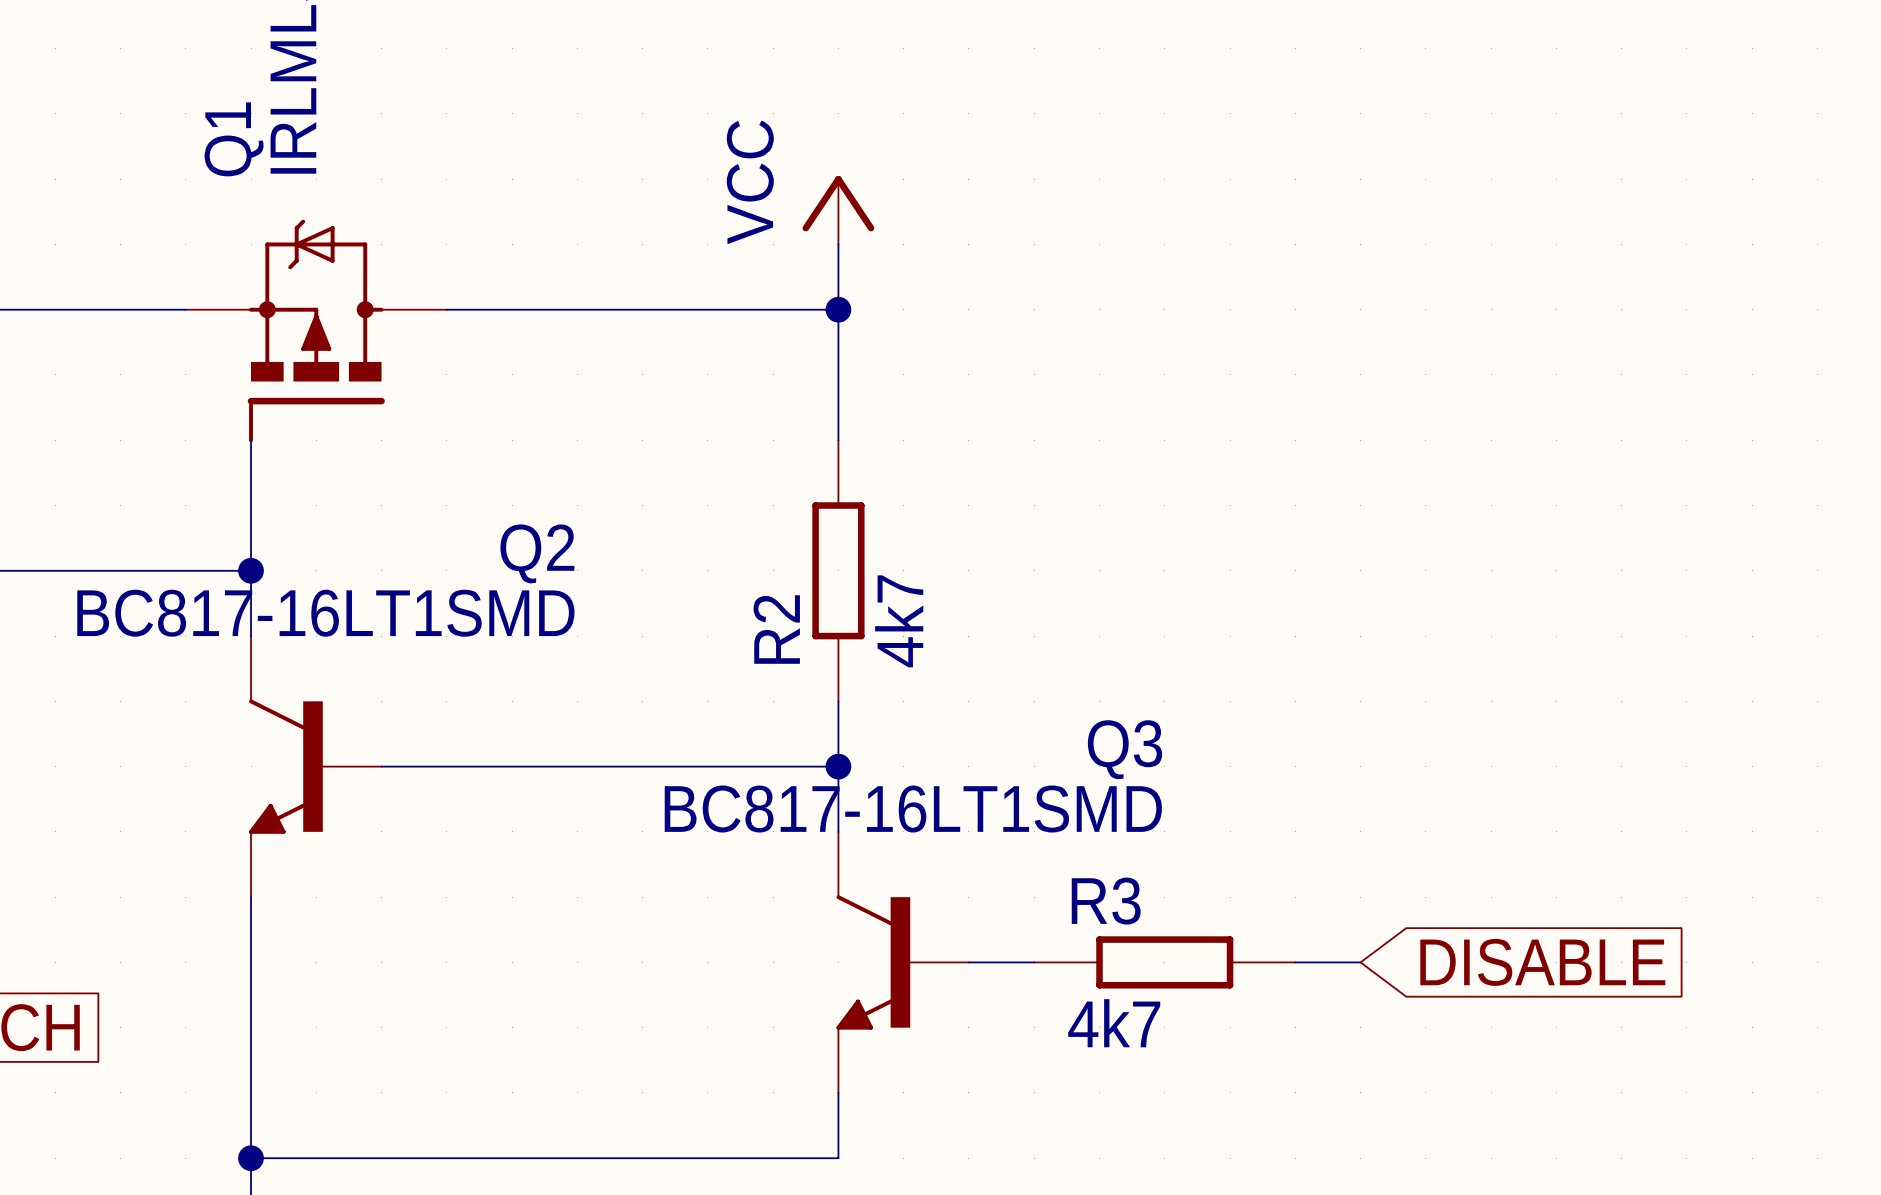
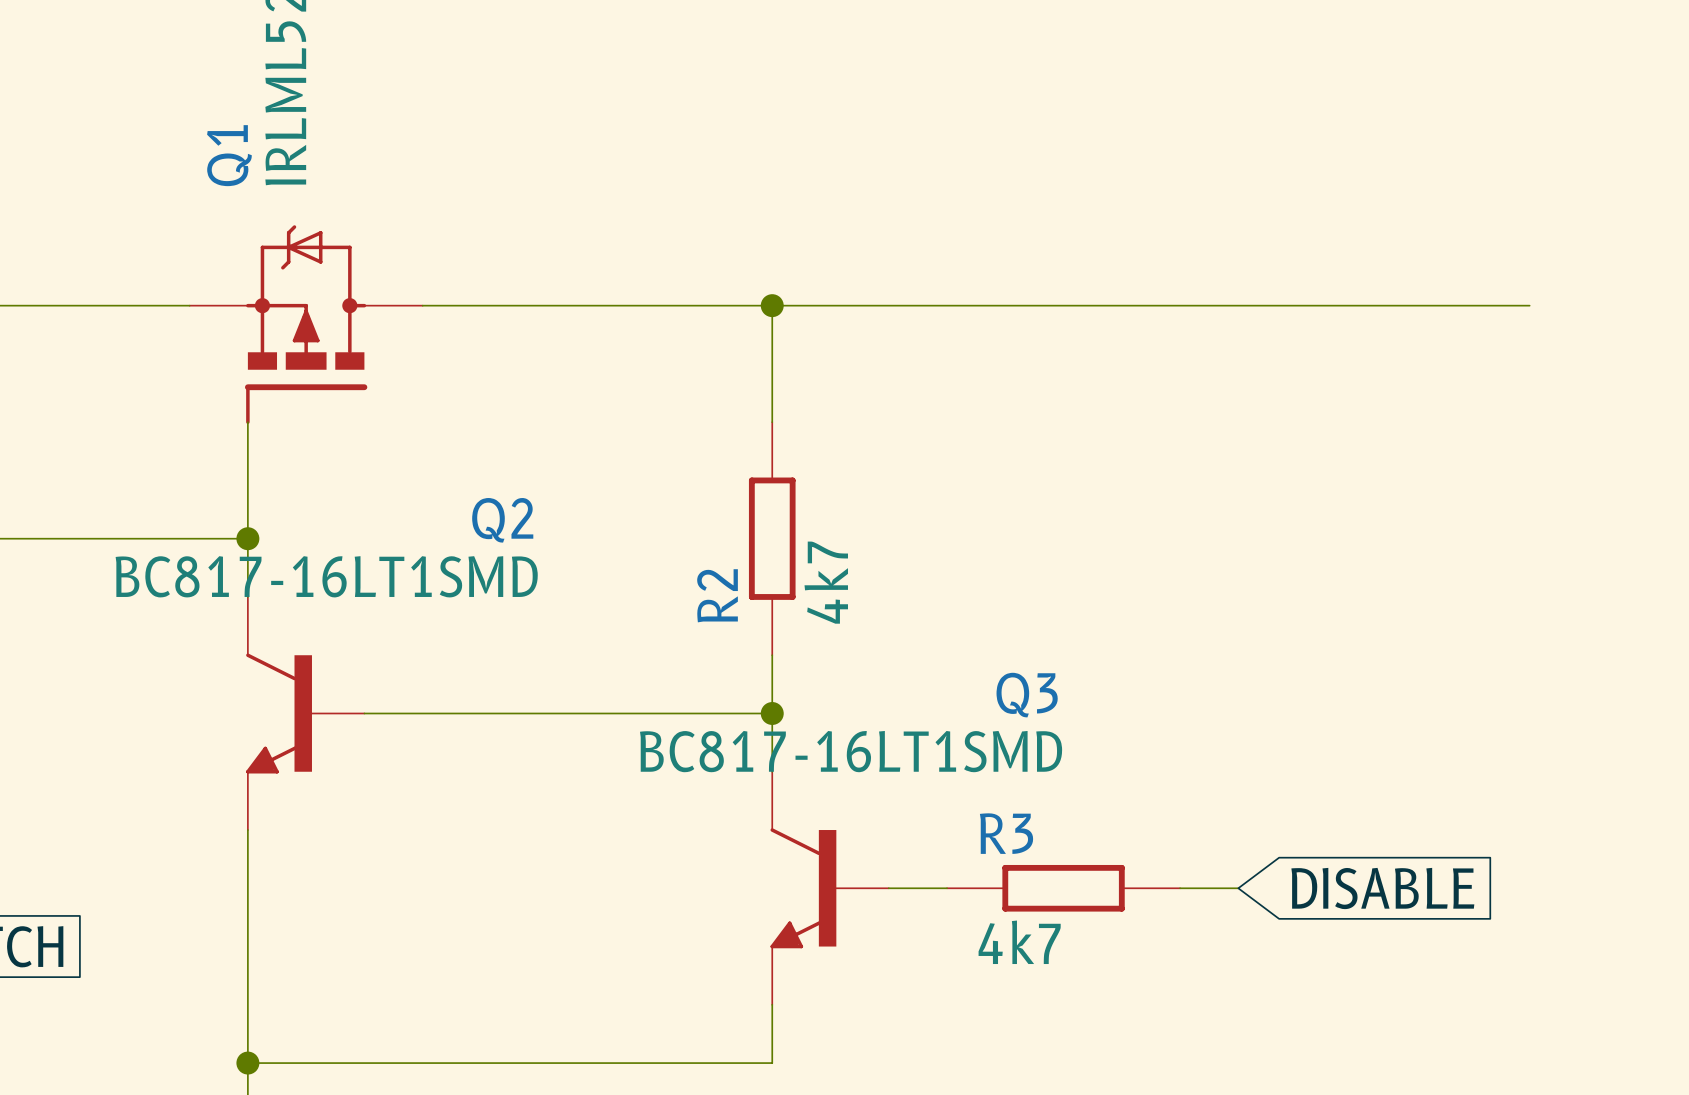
power symbol: VCC (838, 210) -> none
wire: (838, 244) (838, 309) -> (1529, 305) (772, 305)

